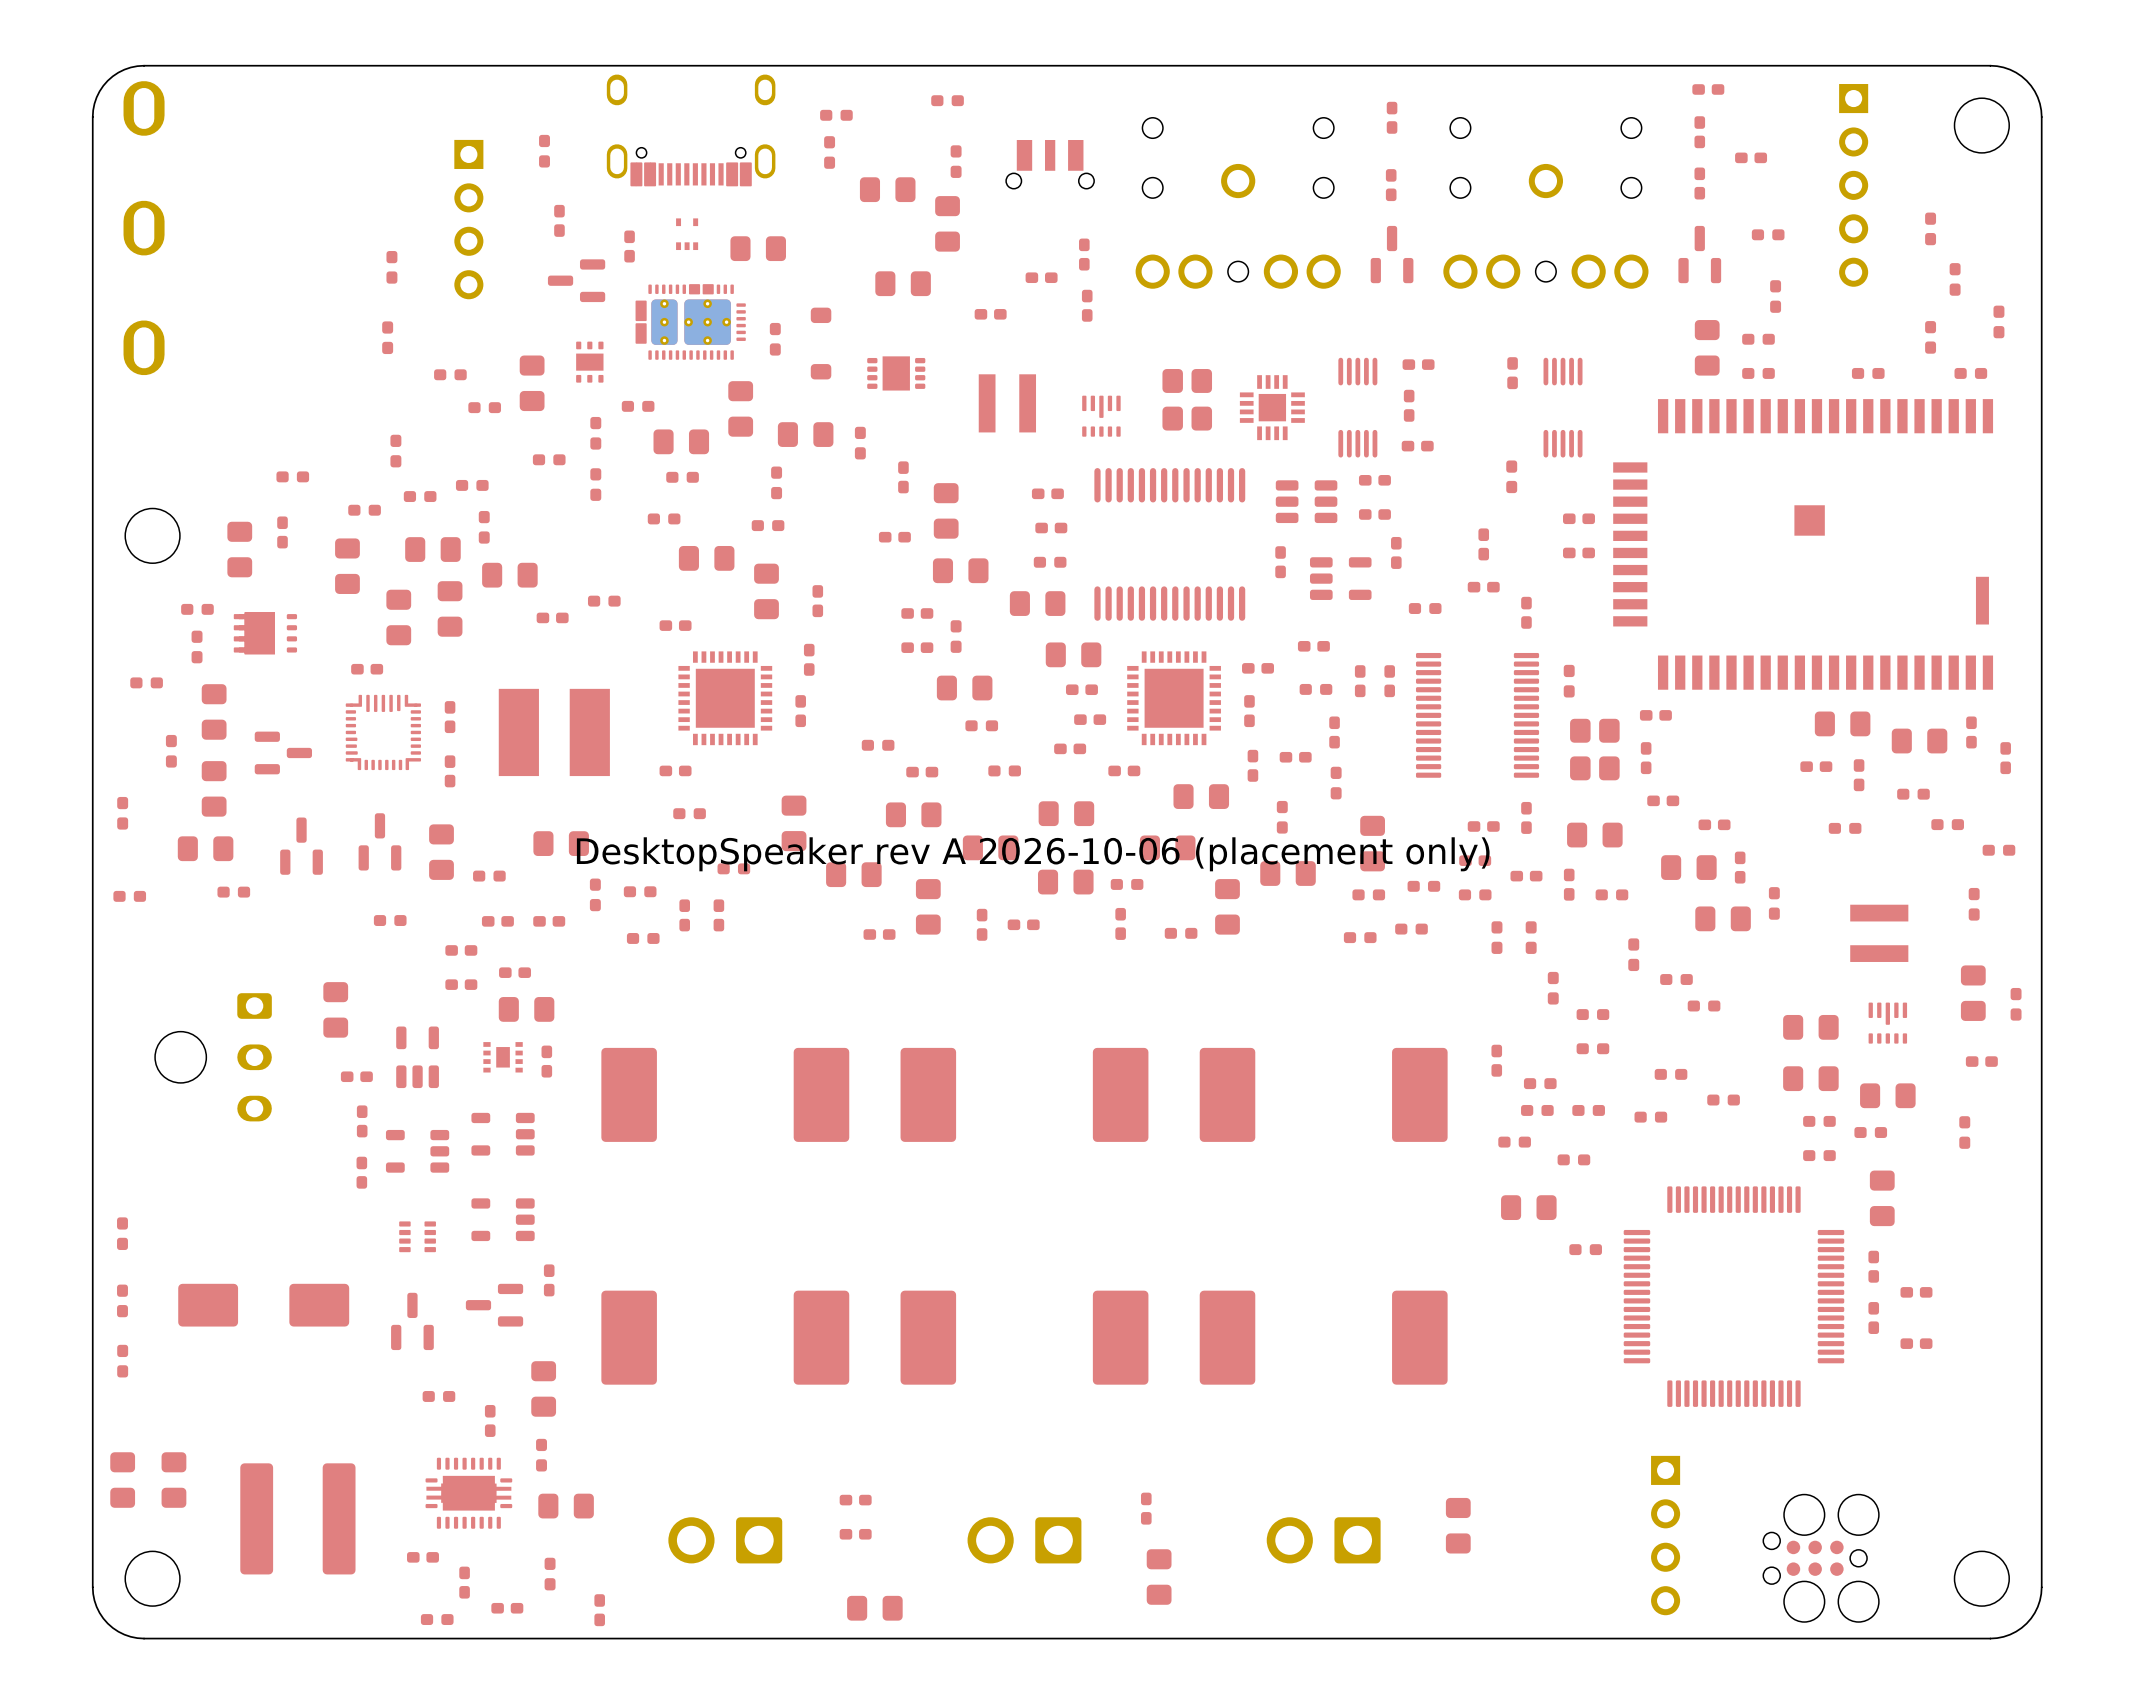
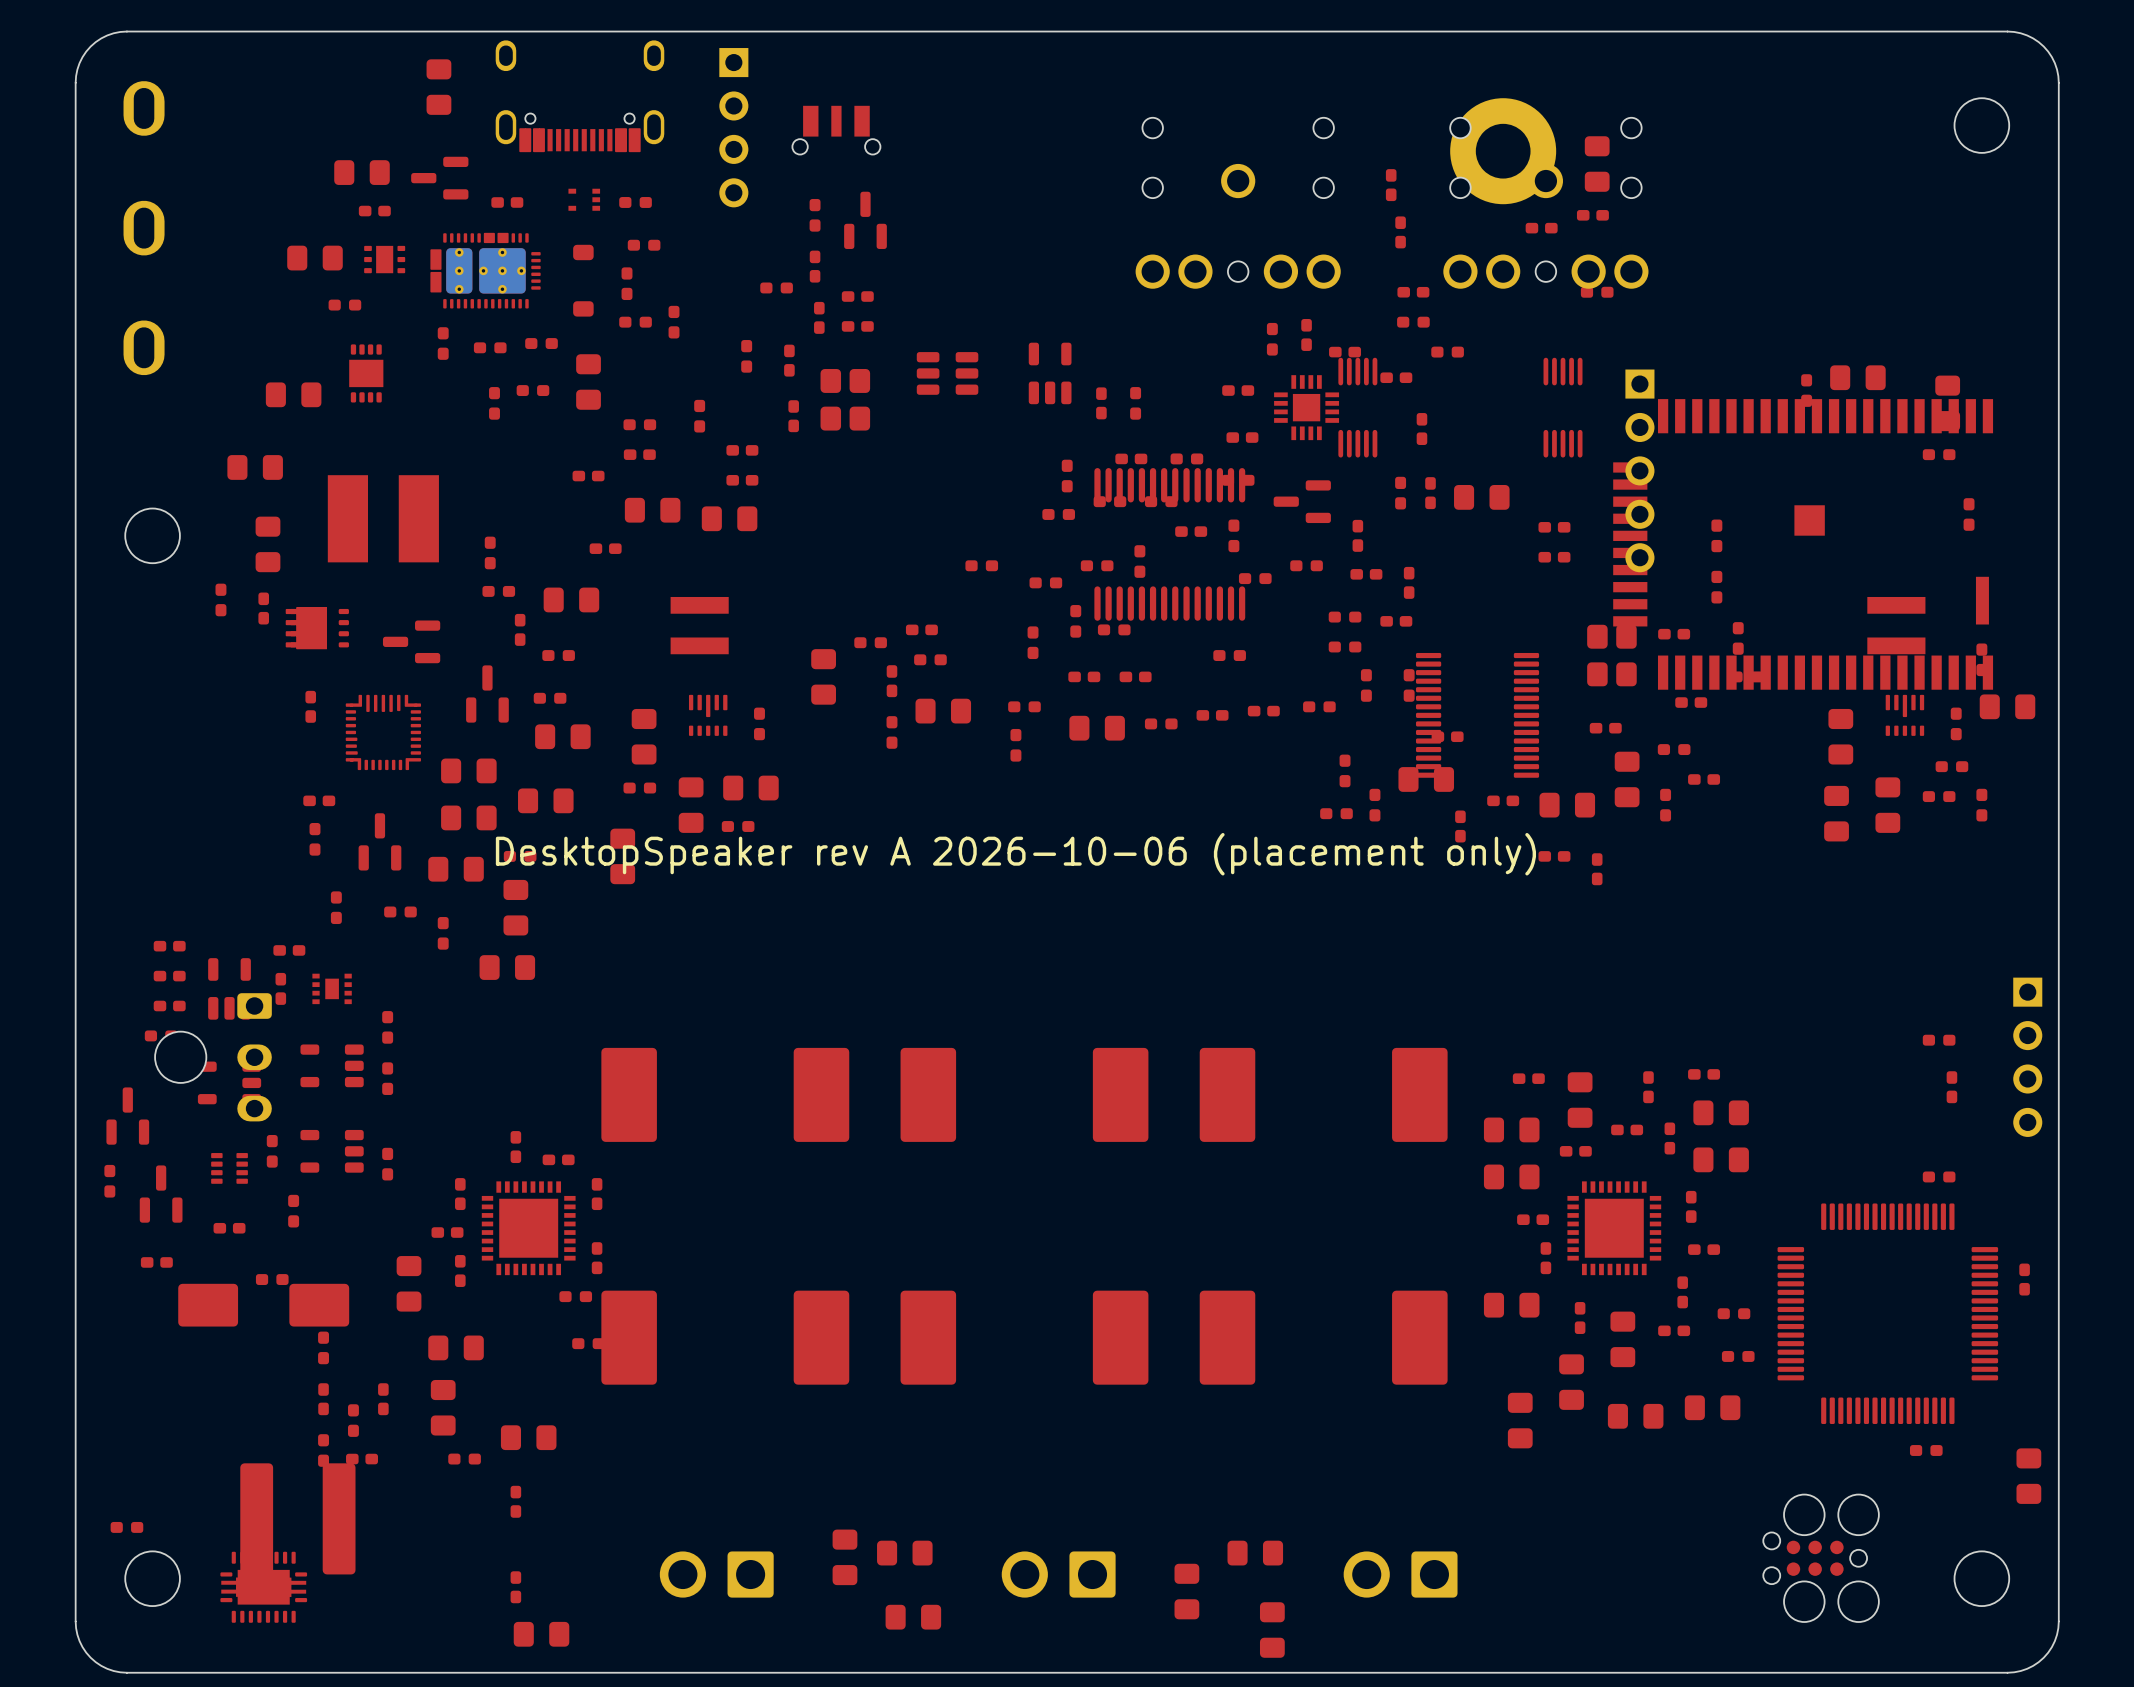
board edge: (1990, 65) (144, 65) (124, 69) (112, 76) (99, 91) (94, 103) (92, 117) (92, 1587) (94, 1600) (103, 1618) (118, 1631) (130, 1636) (144, 1638) (1990, 1638) (2010, 1634) (2021, 1627) (2031, 1618) (2037, 1606) (2041, 1587) (2041, 117) (2037, 97) (2026, 80) (2010, 69) (1990, 65) -> (2007, 31) (2027, 35) (2043, 46) (2054, 63) (2058, 82) (2058, 1621) (2054, 1641) (2048, 1652) (2038, 1662) (2020, 1671) (2007, 1672) (126, 1672) (107, 1668) (95, 1662) (86, 1652) (79, 1641) (75, 1621) (75, 82) (77, 69) (82, 57) (95, 42) (113, 33) (126, 31) (2007, 31)
part: none -> (438, 87)
part: (1708, 89) -> none
part: (947, 100) -> none
part: (836, 115) -> none
part: (1392, 117) -> none
part position: (691, 130) -> (579, 96)
part: (1699, 132) -> none
part: (544, 151) -> none
part: none -> (1503, 151)
part: (829, 152) -> none
part: (1751, 157) -> none
part: (956, 161) -> none
part position: (1050, 164) -> (836, 130)
part: none -> (1597, 164)
part: none -> (362, 172)
part: none -> (439, 178)
part: (1699, 183) -> none
part position: (1853, 185) -> (1639, 470)
part: (887, 189) -> none
part: none -> (635, 202)
part: none -> (374, 211)
part: none -> (815, 215)
part: none -> (1592, 215)
part position: (468, 219) -> (733, 127)
part rotation: 0° (559, 220) -> 90° clockwise (507, 202)
part position: (559, 220) -> (507, 202)
part: none -> (865, 220)
part: (947, 223) -> none
part: none -> (1541, 228)
part: (1930, 228) -> none
part footprint: [624, 230, 635, 263] -> [627, 239, 661, 251]
part: none -> (1400, 232)
part rotation: 0° (687, 234) -> 90° counterclockwise (584, 199)
part position: (687, 234) -> (584, 199)
part: (1768, 234) -> none
part: (758, 248) -> none
part footprint: [386, 251, 398, 284] -> [364, 245, 406, 274]
part: (1084, 254) -> none
part: (1392, 254) -> none
part: (1699, 254) -> none
part: none -> (314, 258)
part footprint: [547, 259, 606, 303] -> [573, 244, 594, 317]
part: none -> (815, 266)
part: none -> (485, 270)
part: (1041, 277) -> none
part: (1955, 279) -> none
part: none -> (627, 283)
part: (903, 283) -> none
part footprint: [635, 284, 746, 360] -> [668, 305, 680, 339]
part: none -> (776, 287)
part: none -> (1413, 292)
part: none -> (1597, 292)
part: none -> (857, 296)
part: (1775, 296) -> none
part: none -> (344, 305)
part: (1087, 305) -> none
part: (990, 314) -> none
part: none -> (819, 317)
part: (1998, 321) -> none
part: none -> (635, 322)
part: none -> (1413, 322)
part: none -> (857, 326)
part: none -> (1306, 334)
part: (387, 337) -> none
part: (1930, 337) -> none
part: (775, 339) -> none
part: none -> (1272, 339)
part: (1758, 339) -> none
part: none -> (443, 343)
part: none -> (541, 343)
part: (821, 343) -> none
part: none -> (490, 347)
part: (1707, 347) -> none
part: none -> (1345, 352)
part: none -> (1447, 352)
part footprint: [519, 355, 545, 412] -> [516, 385, 550, 397]
part: none -> (746, 356)
part: none -> (789, 360)
part: (589, 362) -> none
part: (1418, 364) -> none
part footprint: [1851, 367, 1885, 379] -> [1830, 365, 1886, 391]
part: none -> (366, 373)
part: (896, 373) -> none
part: none -> (947, 373)
part: (1512, 373) -> none
part: (1758, 373) -> none
part: (1970, 373) -> none
part: (450, 374) -> none
part: none -> (1396, 377)
part: none -> (588, 381)
part: none -> (1238, 390)
part: none -> (1806, 390)
part: none -> (293, 394)
part footprint: [1082, 395, 1121, 437] -> [1096, 387, 1107, 420]
part: none -> (845, 399)
part: (1187, 399) -> none
part rotation: 0° (1007, 403) -> 90° clockwise (699, 625)
part position: (1007, 403) -> (699, 625)
part: none -> (1135, 403)
part: none -> (1947, 403)
part: (1409, 405) -> none
part position: (638, 406) -> (639, 424)
part rotation: 0° (484, 407) -> 90° clockwise (494, 403)
part position: (1272, 407) -> (1306, 407)
part: (740, 408) -> none
part: none -> (699, 416)
part: none -> (793, 416)
part: none -> (1421, 429)
part: (595, 433) -> none
part: (805, 434) -> none
part: none -> (1242, 437)
part: (681, 441) -> none
part: (860, 443) -> none
part: (1417, 446) -> none
part: none -> (742, 450)
part: (395, 451) -> none
part: none -> (639, 454)
part: none -> (1939, 454)
part: none -> (1131, 458)
part: none -> (1186, 458)
part: (549, 459) -> none
part: none -> (255, 467)
part footprint: [590, 468, 602, 501] -> [572, 470, 605, 482]
part: (292, 476) -> none
part: none -> (1067, 476)
part: (1511, 476) -> none
part: (682, 477) -> none
part: (903, 477) -> none
part: none -> (742, 480)
part: none -> (1238, 480)
part footprint: [1275, 480, 1338, 524] -> [1273, 480, 1331, 524]
part: (1374, 480) -> none
part: (776, 482) -> none
part: (472, 485) -> none
part: (1047, 493) -> none
part: none -> (1400, 493)
part: none -> (1430, 493)
part: (420, 496) -> none
part: none -> (1481, 497)
part: none -> (1109, 501)
part: none -> (1161, 501)
part: (364, 510) -> none
part: (946, 510) -> none
part footprint: [647, 513, 681, 525] -> [624, 497, 681, 523]
part: none -> (1058, 514)
part: (1374, 514) -> none
part: none -> (1969, 514)
part: none -> (383, 518)
part: none -> (729, 518)
part: (1578, 518) -> none
part: (768, 525) -> none
part position: (484, 527) -> (490, 552)
part: (1051, 527) -> none
part: none -> (1554, 527)
part: none -> (1191, 531)
part: (282, 532) -> none
part: none -> (1233, 535)
part: none -> (1357, 535)
part: none -> (1716, 535)
part: (894, 537) -> none
part: (1483, 544) -> none
part: none -> (605, 548)
part position: (239, 549) -> (267, 544)
part: (432, 549) -> none
part: (1396, 552) -> none
part: (1578, 552) -> none
part: none -> (1554, 557)
part: (706, 558) -> none
part: none -> (1139, 561)
part position: (1050, 562) -> (1045, 582)
part: (1280, 562) -> none
part: none -> (981, 565)
part: none -> (1097, 565)
part: none -> (1306, 565)
part: (347, 566) -> none
part: (960, 570) -> none
part: none -> (1366, 574)
part: (509, 575) -> none
part: none -> (1255, 578)
part rotation: 0° (1340, 578) -> 90° counterclockwise (1050, 373)
part position: (1340, 578) -> (1050, 373)
part: none -> (1409, 582)
part: (1483, 587) -> none
part: none -> (1716, 587)
part: none -> (498, 591)
part: (766, 591) -> none
part: none -> (571, 599)
part: (604, 601) -> none
part: (817, 601) -> none
part: (1037, 603) -> none
part: none -> (263, 608)
part: (450, 608) -> none
part: (1425, 608) -> none
part rotation: 0° (197, 609) -> 90° clockwise (220, 599)
part position: (197, 609) -> (220, 599)
part: (1526, 612) -> none
part: (917, 613) -> none
part: (398, 617) -> none
part rotation: 0° (552, 617) -> 90° clockwise (520, 629)
part position: (552, 617) -> (520, 629)
part: none -> (1345, 617)
part: none -> (1075, 621)
part: none -> (1396, 621)
part: (675, 625) -> none
part: none -> (921, 629)
part: none -> (1114, 629)
part position: (265, 633) -> (317, 628)
part: none -> (1674, 634)
part rotation: 0° (956, 636) -> 90° clockwise (930, 659)
part position: (956, 636) -> (930, 659)
part: none -> (1738, 638)
part: none -> (411, 641)
part: none -> (870, 642)
part: none -> (1033, 642)
part: (197, 646) -> none
part: (1313, 646) -> none
part: none -> (1345, 646)
part: (917, 647) -> none
part: (1073, 654) -> none
part: none -> (558, 655)
part: none -> (1229, 655)
part: (809, 659) -> none
part: none -> (1981, 659)
part footprint: [1354, 665, 1366, 698] -> [1360, 669, 1372, 702]
part: (1258, 668) -> none
part: (367, 669) -> none
part: none -> (823, 676)
part: none -> (1135, 676)
part: none -> (1746, 676)
part: none -> (891, 681)
part: (1389, 681) -> none
part: (1569, 681) -> none
part: (146, 682) -> none
part: none -> (1409, 685)
part footprint: [498, 688, 610, 777] -> [535, 724, 591, 750]
part position: (964, 688) -> (943, 711)
part position: (1081, 689) -> (1084, 676)
part position: (1315, 689) -> (1319, 706)
part: none -> (487, 694)
part: none -> (550, 698)
part: (725, 698) -> none
part: (1174, 698) -> none
part: none -> (1691, 702)
part: none -> (310, 706)
part: none -> (1024, 706)
part: none -> (2007, 706)
part: (214, 711) -> none
part: (800, 711) -> none
part rotation: 0° (1249, 711) -> 90° clockwise (1263, 711)
part footprint: [1074, 714, 1107, 725] -> [1069, 715, 1125, 741]
part: none -> (708, 715)
part: none -> (1212, 715)
part: (1655, 715) -> none
part: (450, 717) -> none
part: none -> (759, 723)
part: none -> (1161, 723)
part rotation: 0° (1842, 723) -> 90° clockwise (1840, 736)
part: none -> (1956, 723)
part: (981, 725) -> none
part: none -> (1605, 728)
part: (1334, 732) -> none
part: (1971, 732) -> none
part: none -> (644, 736)
part: none -> (1447, 736)
part: (1919, 741) -> none
part rotation: 0° (878, 745) -> 90° clockwise (891, 732)
part: none -> (1015, 745)
part: (1070, 748) -> none
part position: (1594, 749) -> (1611, 655)
part: none -> (1674, 749)
part: (171, 751) -> none
part: (283, 752) -> none
part: (1295, 757) -> none
part: (1646, 758) -> none
part: (2005, 758) -> none
part: (1252, 765) -> none
part: (1816, 766) -> none
part: none -> (1951, 766)
part: none -> (468, 770)
part: (675, 770) -> none
part: (1004, 770) -> none
part: (1124, 770) -> none
part: (450, 771) -> none
part: (922, 772) -> none
part: (1859, 775) -> none
part: none -> (1426, 779)
part: none -> (1627, 779)
part: none -> (1704, 779)
part position: (1336, 783) -> (1345, 770)
part: (214, 788) -> none
part: none -> (639, 788)
part: (1913, 794) -> none
part footprint: [1647, 795, 1680, 807] -> [1660, 788, 1672, 822]
part: (1201, 796) -> none
part: none -> (1939, 796)
part: none -> (319, 800)
part: none -> (545, 800)
part: none -> (1503, 800)
part: none -> (1374, 805)
part: none -> (1567, 805)
part: none -> (1887, 805)
part: none -> (1981, 805)
part footprint: [673, 808, 706, 820] -> [678, 777, 704, 833]
part: (122, 813) -> none
part: (1066, 813) -> none
part: none -> (1336, 813)
part: (913, 814) -> none
part footprint: [280, 817, 323, 875] -> [309, 822, 321, 856]
part: none -> (468, 817)
part: (1282, 817) -> none
part: (1526, 817) -> none
part footprint: [1828, 822, 1862, 834] -> [1824, 785, 1849, 842]
part rotation: 0° (794, 823) -> 90° clockwise (750, 788)
part position: (794, 823) -> (750, 788)
part: (1714, 824) -> none
part: (1947, 824) -> none
part: none -> (1460, 826)
part: (1483, 826) -> none
part: (1594, 835) -> none
part: (561, 843) -> none
part: (1372, 843) -> none
part: (990, 847) -> none
part: (1167, 847) -> none
part: (205, 848) -> none
part: (1998, 850) -> none
part: (441, 852) -> none
text position: DesktopSpeaker rev A 2026-10-06 (placement only) (1033, 854) -> DesktopSpeaker rev A 2026-10-06 (placement only) (1015, 854)
part: none -> (622, 856)
part: none -> (1554, 856)
part: (1475, 860) -> none
part: (1688, 867) -> none
part: (1740, 867) -> none
part position: (733, 868) -> (738, 826)
part: none -> (456, 869)
part: none -> (1597, 869)
part: (1288, 873) -> none
part: (853, 874) -> none
part position: (489, 876) -> (520, 856)
part: (1526, 876) -> none
part: (1065, 882) -> none
part: (1127, 884) -> none
part: (1569, 884) -> none
part: (1423, 886) -> none
part: (640, 891) -> none
part: (233, 892) -> none
part: (595, 894) -> none
part: (1368, 894) -> none
part: (1475, 894) -> none
part: (1611, 894) -> none
part: (129, 896) -> none
part: (1774, 903) -> none
part: (1974, 904) -> none
part: (928, 906) -> none
part: (1227, 906) -> none
part: none -> (336, 907)
part: none -> (515, 907)
part: (684, 915) -> none
part: (718, 915) -> none
part: (1723, 918) -> none
part position: (390, 920) -> (400, 911)
part: (497, 921) -> none
part: (549, 921) -> none
part: (1120, 923) -> none
part: (982, 924) -> none
part: (1023, 924) -> none
part: (1411, 929) -> none
part: none -> (443, 933)
part: (1181, 933) -> none
part position: (1879, 933) -> (1896, 625)
part: (879, 934) -> none
part: (1360, 937) -> none
part: (1496, 937) -> none
part: (1531, 937) -> none
part: (643, 938) -> none
part: none -> (169, 946)
part: none -> (289, 950)
part: (461, 950) -> none
part: (1633, 954) -> none
part footprint: [499, 967, 532, 978] -> [479, 955, 536, 980]
part: none -> (169, 976)
part: (1676, 979) -> none
part: (461, 984) -> none
part: none -> (280, 988)
part: (1553, 988) -> none
part: (1973, 993) -> none
part: (2016, 1004) -> none
part: none -> (169, 1006)
part: (1704, 1006) -> none
part: (335, 1009) -> none
part: (526, 1009) -> none
part: (1592, 1014) -> none
part position: (1887, 1023) -> (1904, 715)
part: none -> (387, 1027)
part: (1810, 1027) -> none
part: none -> (161, 1035)
part: none -> (1939, 1040)
part: (1592, 1048) -> none
part position: (417, 1057) -> (229, 988)
part position: (503, 1057) -> (332, 988)
part: none -> (2027, 1057)
part: (1496, 1060) -> none
part: (546, 1061) -> none
part rotation: 0° (1981, 1061) -> 90° clockwise (1951, 1087)
part position: (1981, 1061) -> (1951, 1087)
part: none -> (332, 1065)
part: (1671, 1074) -> none
part: none -> (1704, 1074)
part: (356, 1076) -> none
part: none -> (387, 1078)
part footprint: [1523, 1078, 1557, 1090] -> [1512, 1073, 1545, 1084]
part: (1810, 1078) -> none
part: none -> (229, 1082)
part: none -> (1648, 1087)
part footprint: [1707, 1094, 1740, 1106] -> [1693, 1100, 1749, 1126]
part: (1887, 1095) -> none
part footprint: [1572, 1104, 1605, 1116] -> [1567, 1072, 1593, 1128]
part: (1537, 1110) -> none
part: none -> (127, 1116)
part: (1650, 1117) -> none
part: (362, 1121) -> none
part: (1819, 1121) -> none
part: none -> (1627, 1129)
part: (1870, 1132) -> none
part: (1964, 1132) -> none
part: (503, 1134) -> none
part footprint: [1498, 1136, 1531, 1148] -> [1483, 1117, 1540, 1143]
part: none -> (1669, 1138)
part: none -> (515, 1147)
part: none -> (272, 1151)
part: none -> (332, 1151)
part: (417, 1151) -> none
part footprint: [1557, 1154, 1591, 1166] -> [1559, 1146, 1592, 1157]
part: (1819, 1155) -> none
part: none -> (558, 1159)
part: none -> (1721, 1159)
part: none -> (387, 1164)
part: (361, 1172) -> none
part: none -> (1511, 1176)
part: none -> (1939, 1176)
part footprint: [1623, 1186, 1845, 1407] -> [1717, 1308, 1751, 1320]
part: none -> (161, 1194)
part: none -> (460, 1194)
part: none -> (597, 1194)
part footprint: [1501, 1195, 1557, 1221] -> [1517, 1214, 1550, 1226]
part: (1882, 1198) -> none
part: none -> (1691, 1206)
part: none -> (293, 1211)
part: (503, 1219) -> none
part: none -> (229, 1228)
part: none -> (528, 1228)
part: none -> (1614, 1228)
part: none -> (447, 1232)
part position: (122, 1233) -> (109, 1181)
part position: (417, 1236) -> (229, 1168)
part: (1585, 1249) -> none
part: none -> (1704, 1249)
part: none -> (597, 1258)
part: none -> (1545, 1258)
part: none -> (156, 1262)
part: (1873, 1266) -> none
part: none -> (460, 1270)
part: none -> (272, 1279)
part: none -> (2024, 1279)
part: (549, 1280) -> none
part: none -> (409, 1283)
part: none -> (1682, 1292)
part: (1916, 1292) -> none
part: none -> (575, 1296)
part: (122, 1300) -> none
part footprint: [1868, 1302, 1880, 1334] -> [1777, 1203, 1999, 1425]
part: (494, 1305) -> none
part: none -> (1511, 1305)
part: none -> (1580, 1318)
part: (412, 1321) -> none
part: none -> (1674, 1330)
part: none -> (1622, 1339)
part: none -> (588, 1343)
part: (1916, 1343) -> none
part: none -> (323, 1347)
part: none -> (456, 1347)
part: none -> (1738, 1356)
part: (122, 1361) -> none
part: none -> (1571, 1382)
part: (543, 1388) -> none
part footprint: [422, 1391, 456, 1402] -> [430, 1379, 456, 1436]
part: none -> (323, 1399)
part: none -> (383, 1399)
part: none -> (1712, 1407)
part: none -> (1635, 1416)
part: none -> (353, 1420)
part: (490, 1420) -> none
part: none -> (1520, 1420)
part: none -> (528, 1437)
part: none -> (323, 1450)
part: none -> (1926, 1450)
part: (541, 1455) -> none
part: none -> (362, 1459)
part: none -> (464, 1459)
part: none -> (2028, 1476)
part: (122, 1480) -> none
part: (173, 1480) -> none
part position: (468, 1493) -> (263, 1587)
part: (855, 1500) -> none
part: none -> (515, 1501)
part: (566, 1506) -> none
part: (1146, 1508) -> none
part: (1458, 1525) -> none
part: none -> (126, 1527)
part: (855, 1534) -> none
part: (1665, 1535) -> none
part position: (725, 1540) -> (716, 1574)
part position: (1024, 1540) -> (1058, 1574)
part position: (1323, 1540) -> (1400, 1574)
part: none -> (904, 1553)
part: none -> (1255, 1553)
part: (422, 1557) -> none
part: none -> (844, 1557)
part: (550, 1574) -> none
part position: (1159, 1577) -> (1186, 1591)
part: (464, 1582) -> none
part rotation: 0° (507, 1608) -> 90° clockwise (515, 1587)
part position: (507, 1608) -> (515, 1587)
part: (874, 1608) -> none
part: (599, 1610) -> none
part: none -> (913, 1617)
part: (437, 1619) -> none
part: none -> (1272, 1630)
part: none -> (541, 1634)

